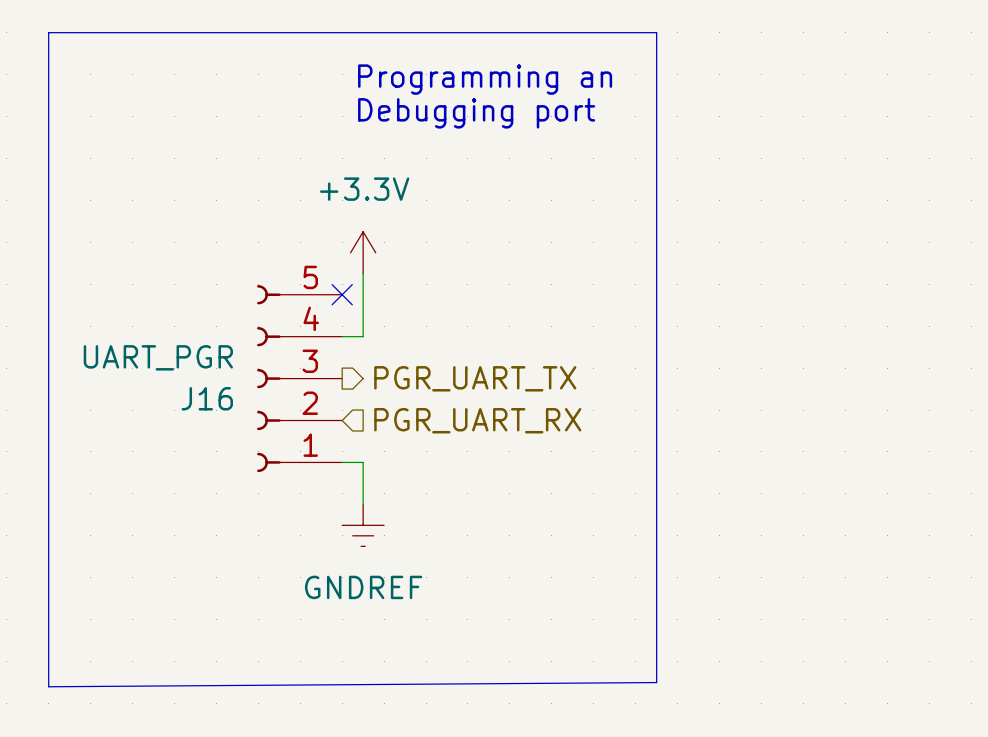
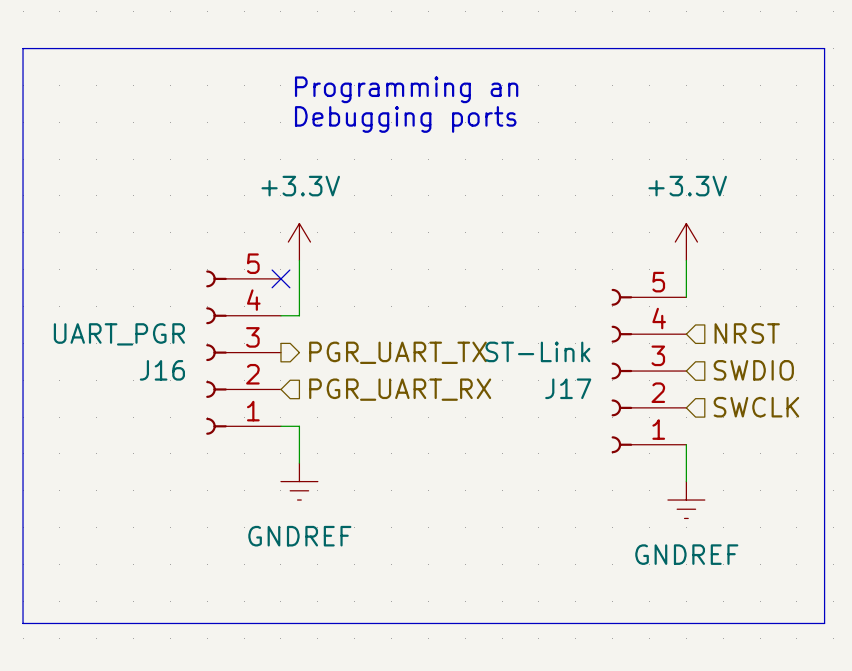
line: (656, 32) (656, 682) (48, 686) -> (557, 48) (824, 48) (824, 623) (23, 623)
text: Debugging port (476, 113) -> Debugging ports (405, 119)
power symbol: none -> +3.3V (686, 242)
wire: none -> (686, 260) (686, 297)
hierarchical label: none -> NRST (747, 333)
hierarchical label: none -> SWDIO (753, 370)
J17: none -> ST-Link (648, 371)
hierarchical label: none -> SWCLK (756, 407)
wire: none -> (686, 444) (686, 481)
power symbol: none -> GNDREF (686, 500)

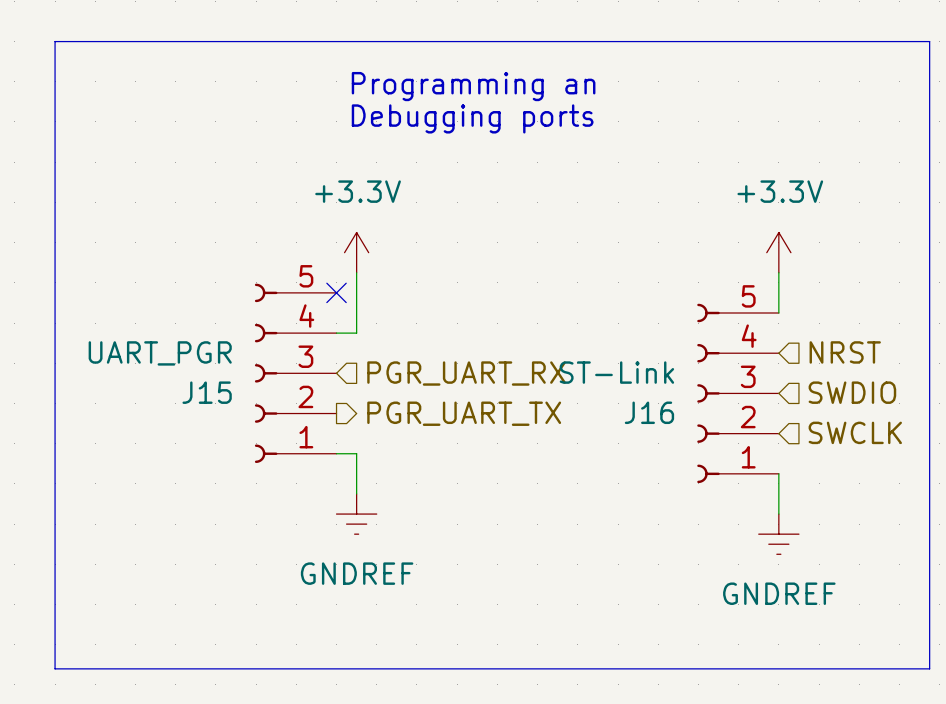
hierarchical label shape: output (397, 352) -> input (466, 373)
hierarchical label: PGR_UART_TX (397, 352) -> PGR_UART_RX (466, 373)
J16 name: J16 (162, 370) -> J15 (207, 392)
J17 name: J17 (568, 388) -> J16 (649, 412)
hierarchical label shape: input (400, 389) -> output (464, 413)
hierarchical label: PGR_UART_RX (400, 389) -> PGR_UART_TX (464, 413)

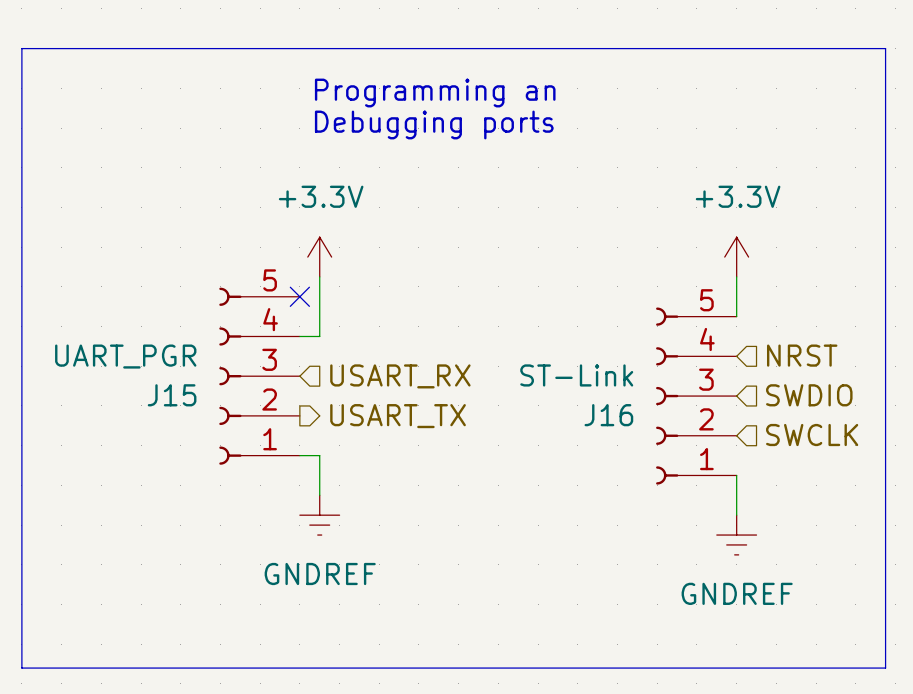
hierarchical label: PGR_UART_RX (466, 373) -> USART_RX (400, 376)
hierarchical label: PGR_UART_TX (464, 413) -> USART_TX (398, 416)

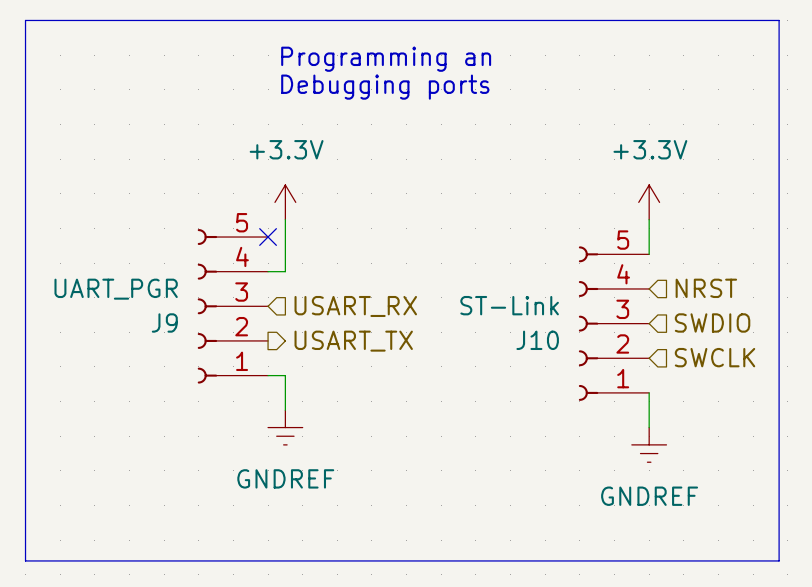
J15 name: J15 (172, 395) -> J9 (164, 322)
J16 name: J16 (608, 415) -> J10 (537, 340)

